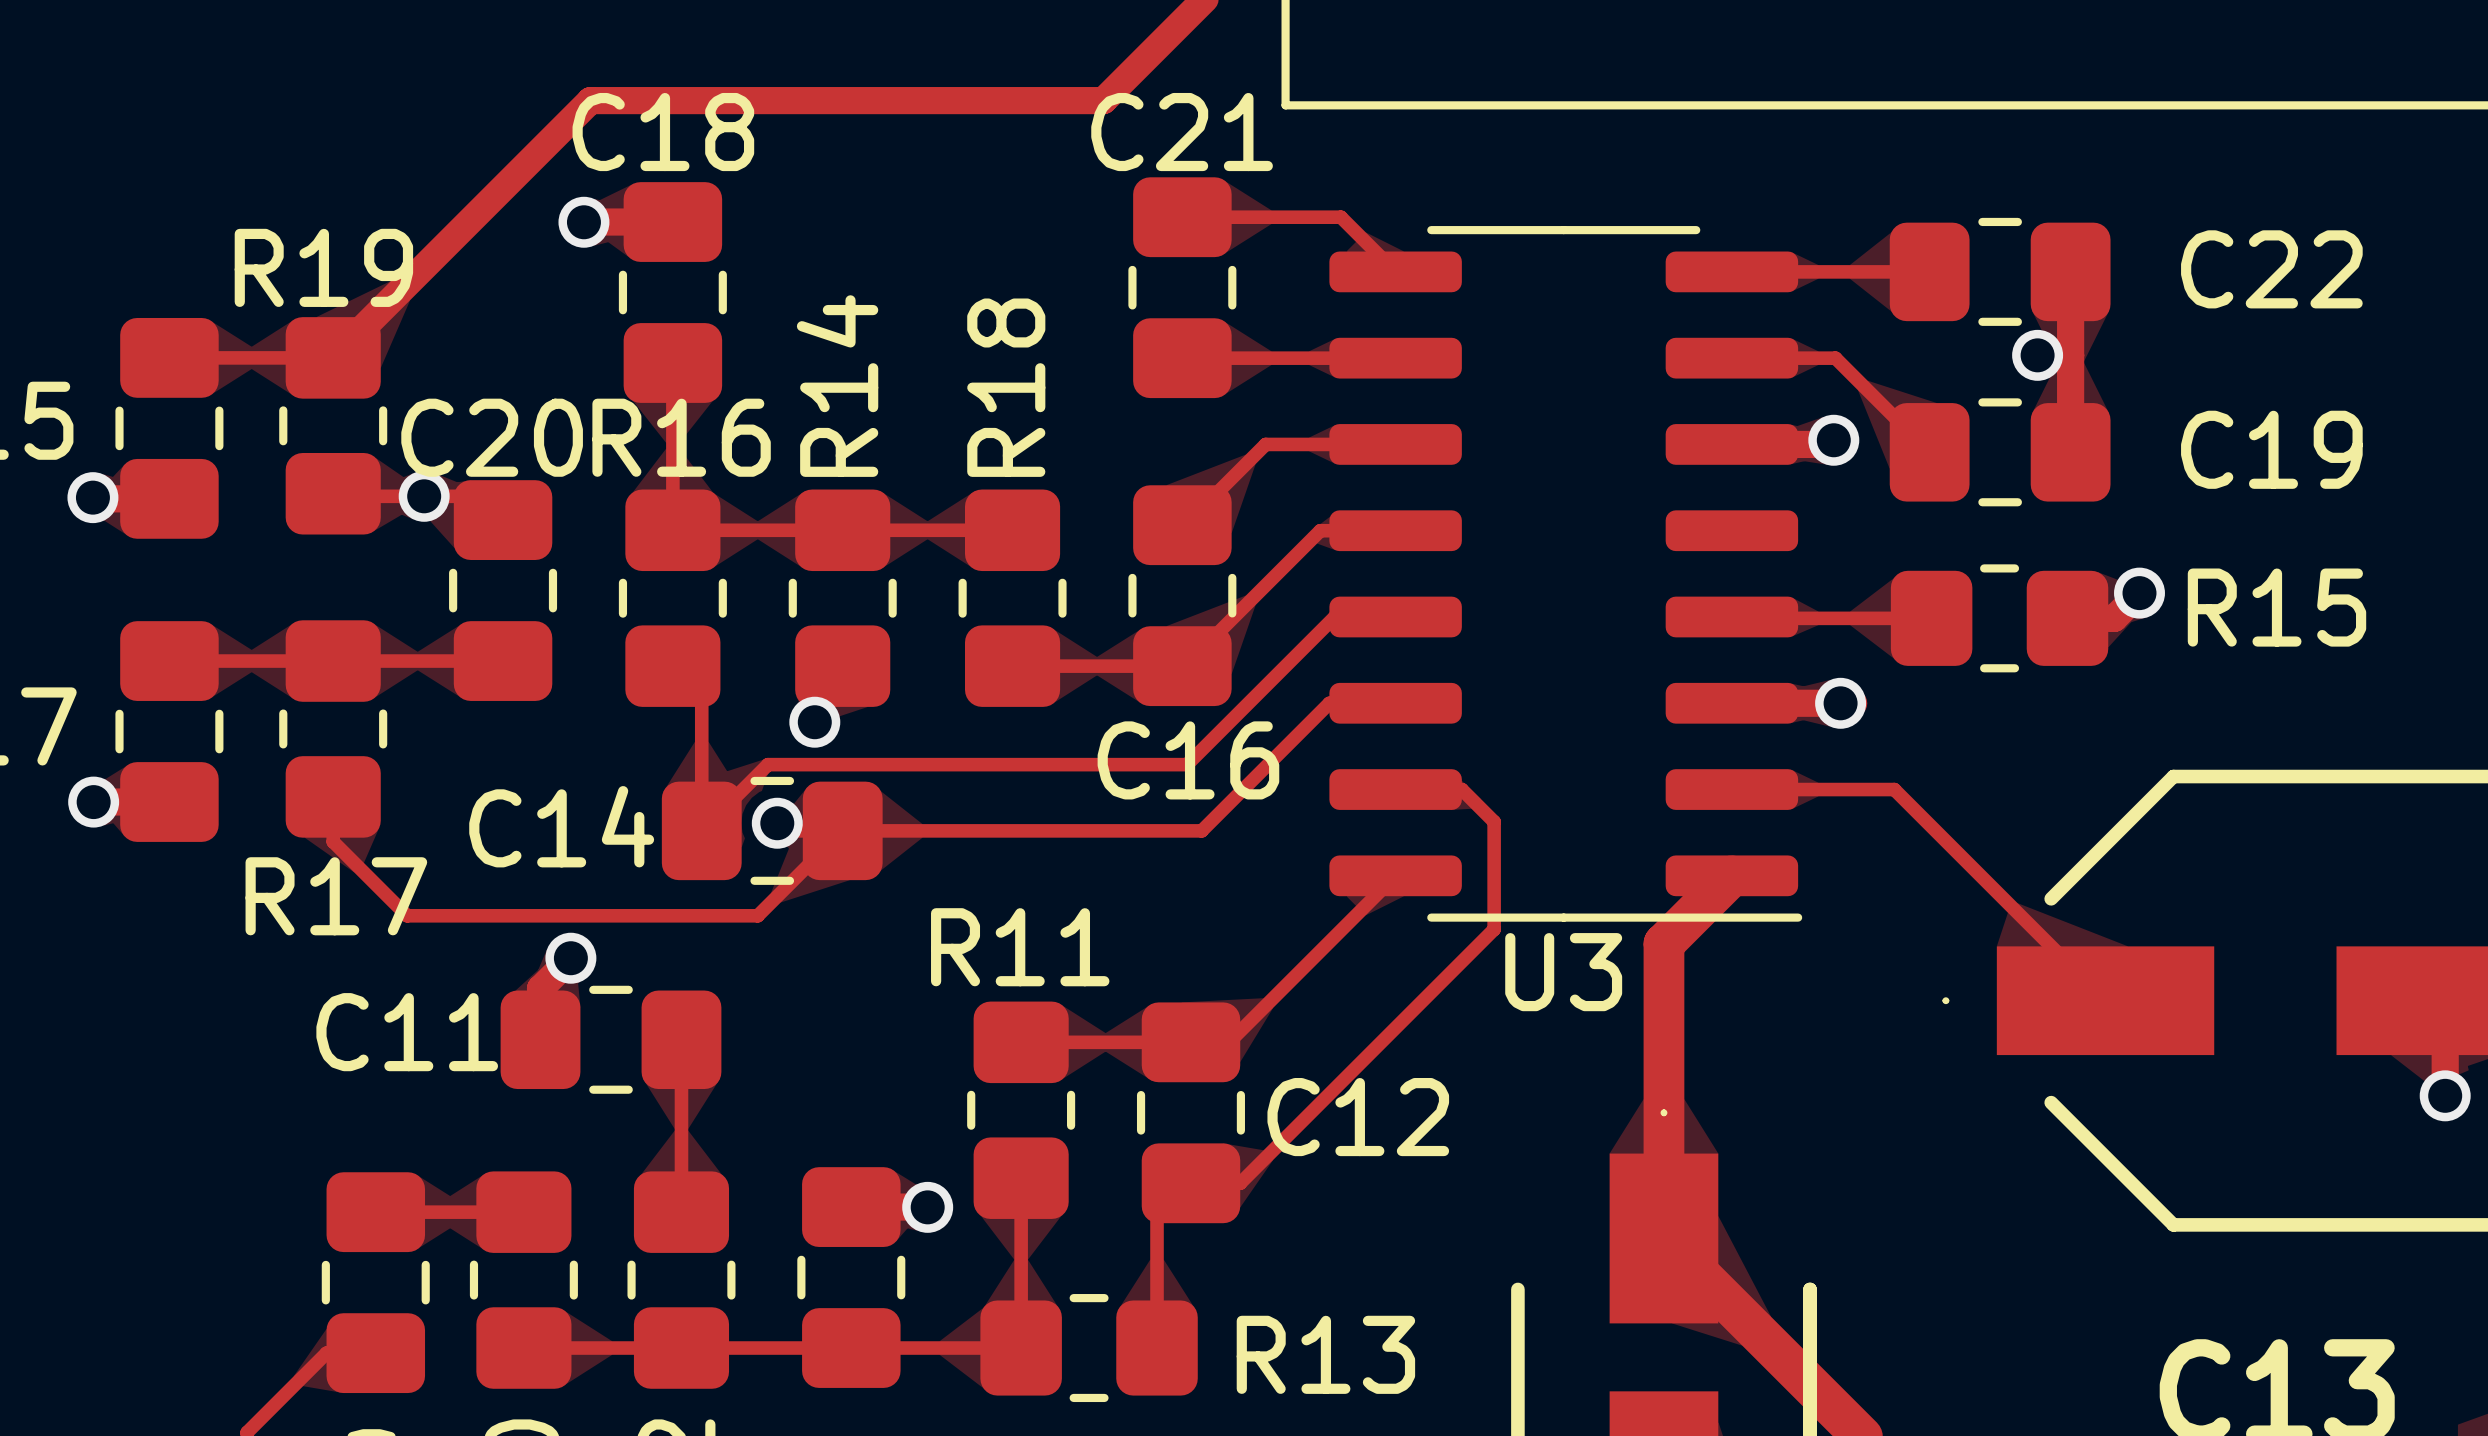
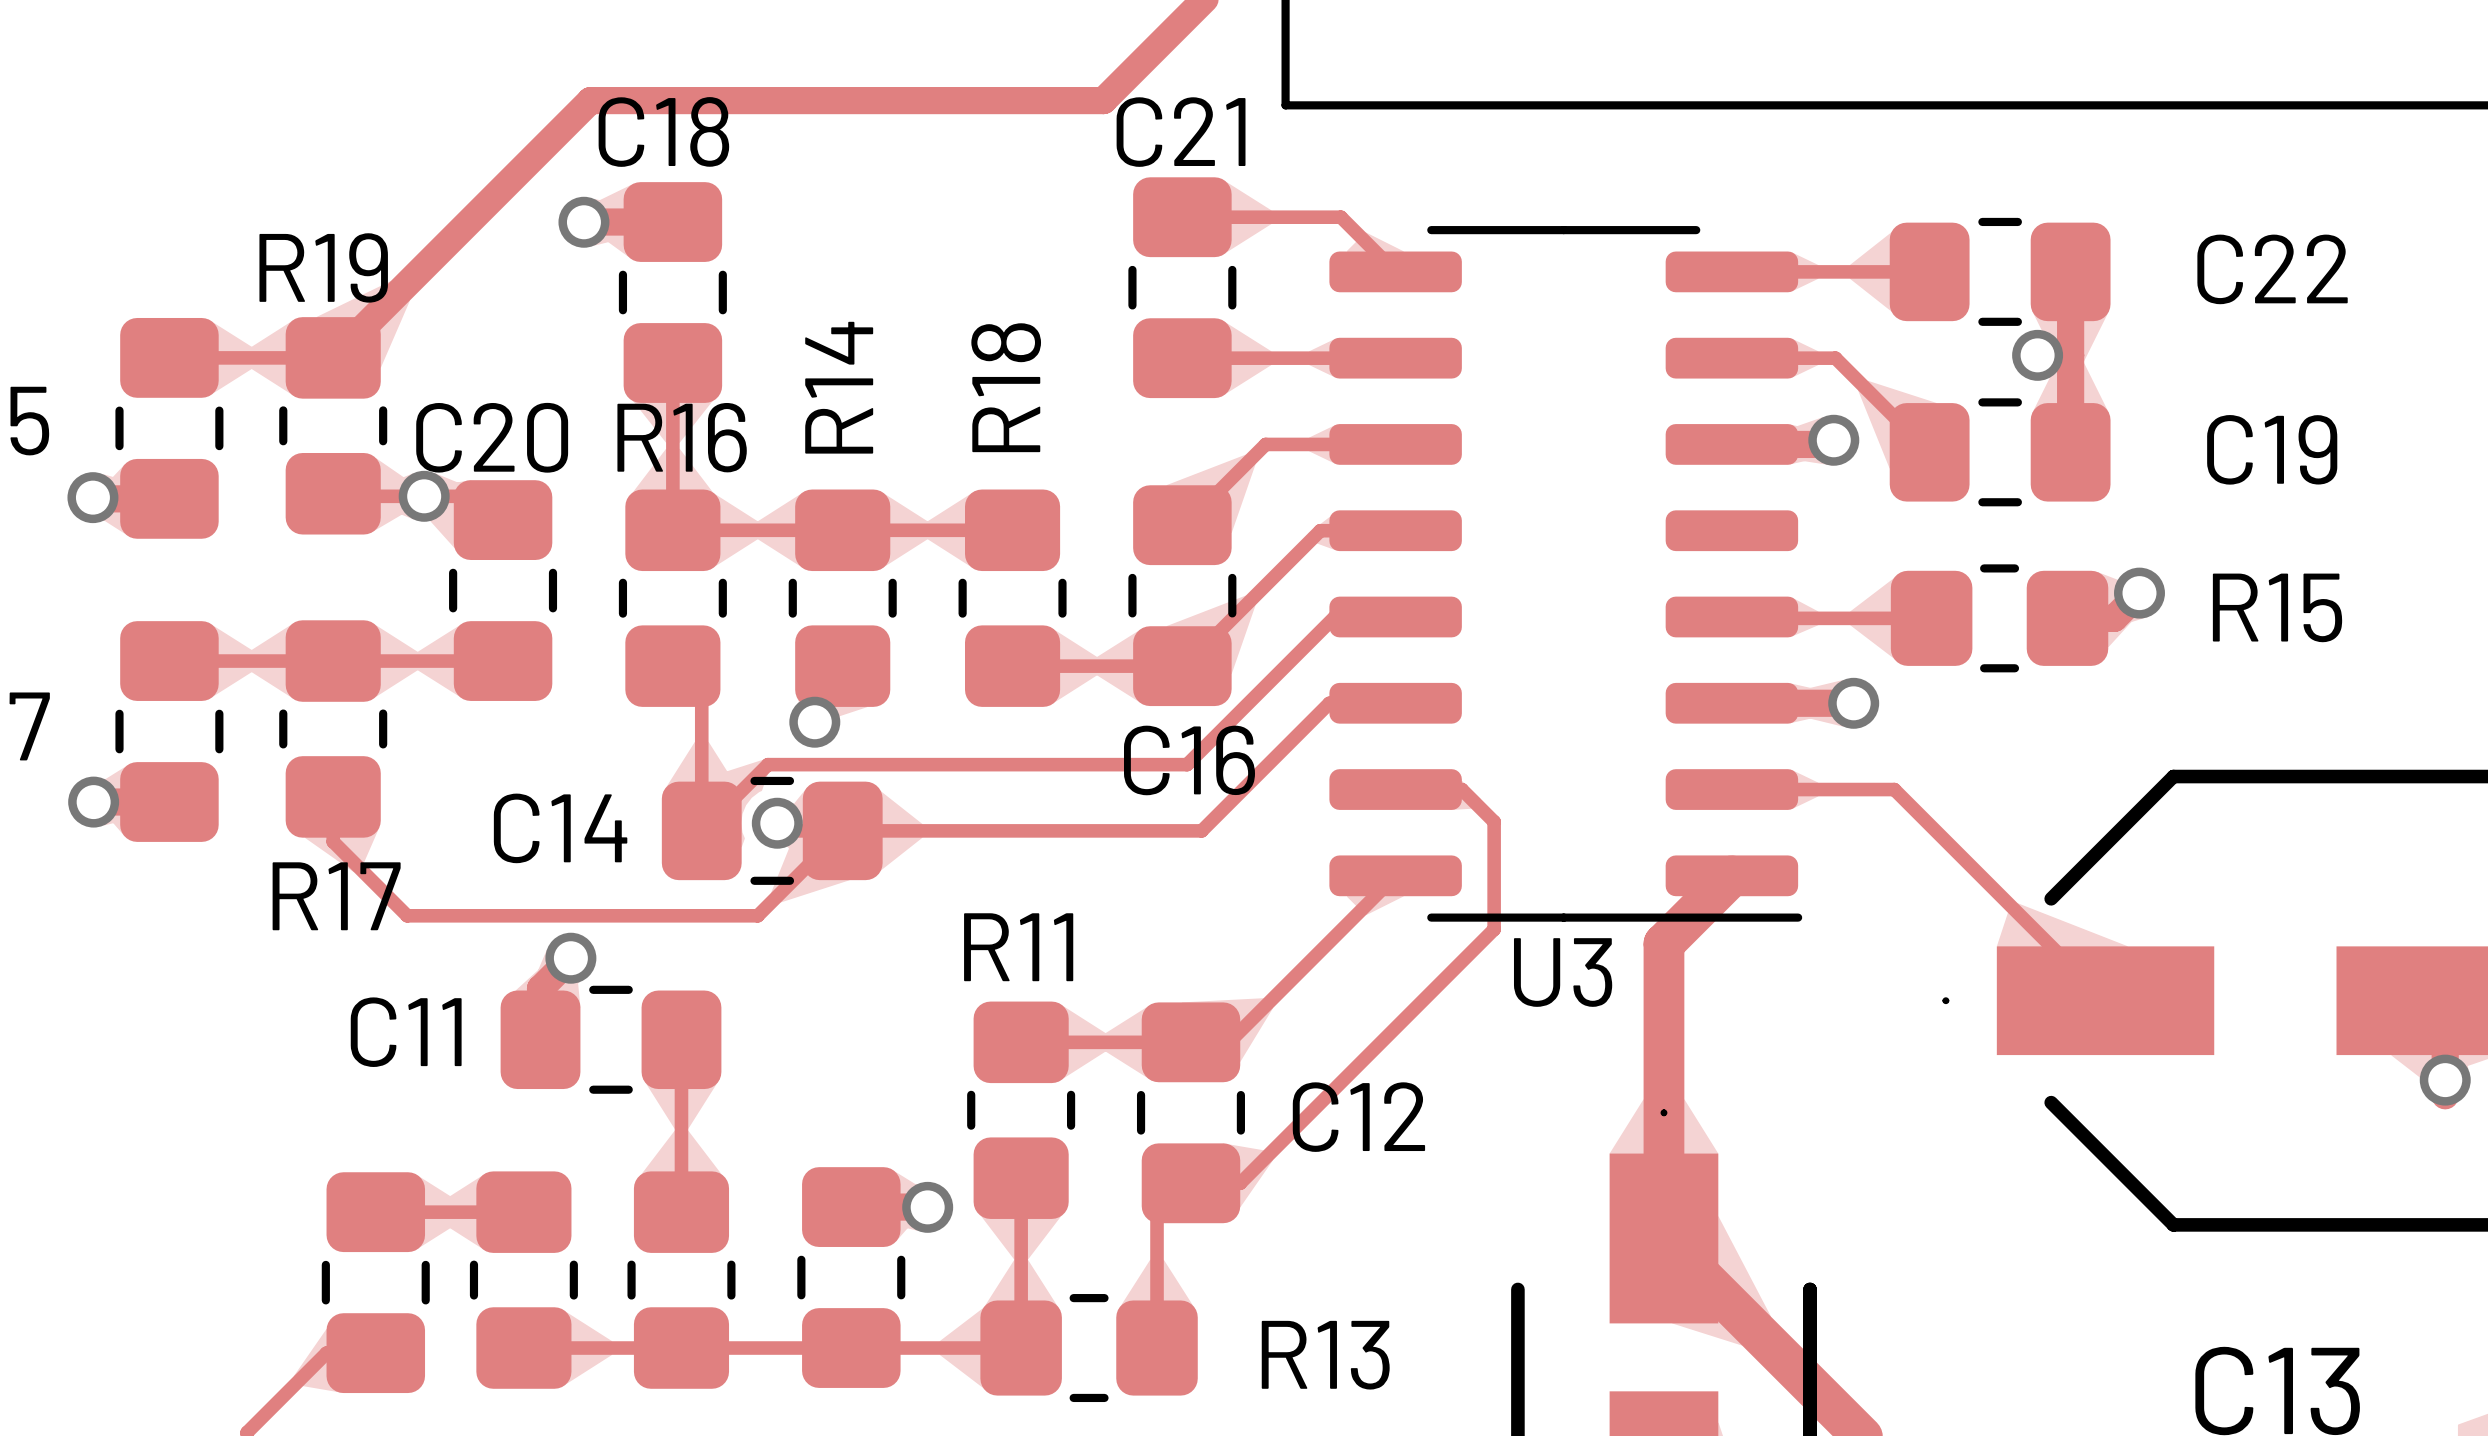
via position: (1840, 703) -> (1853, 703)
via position: (2445, 1095) -> (2445, 1080)

